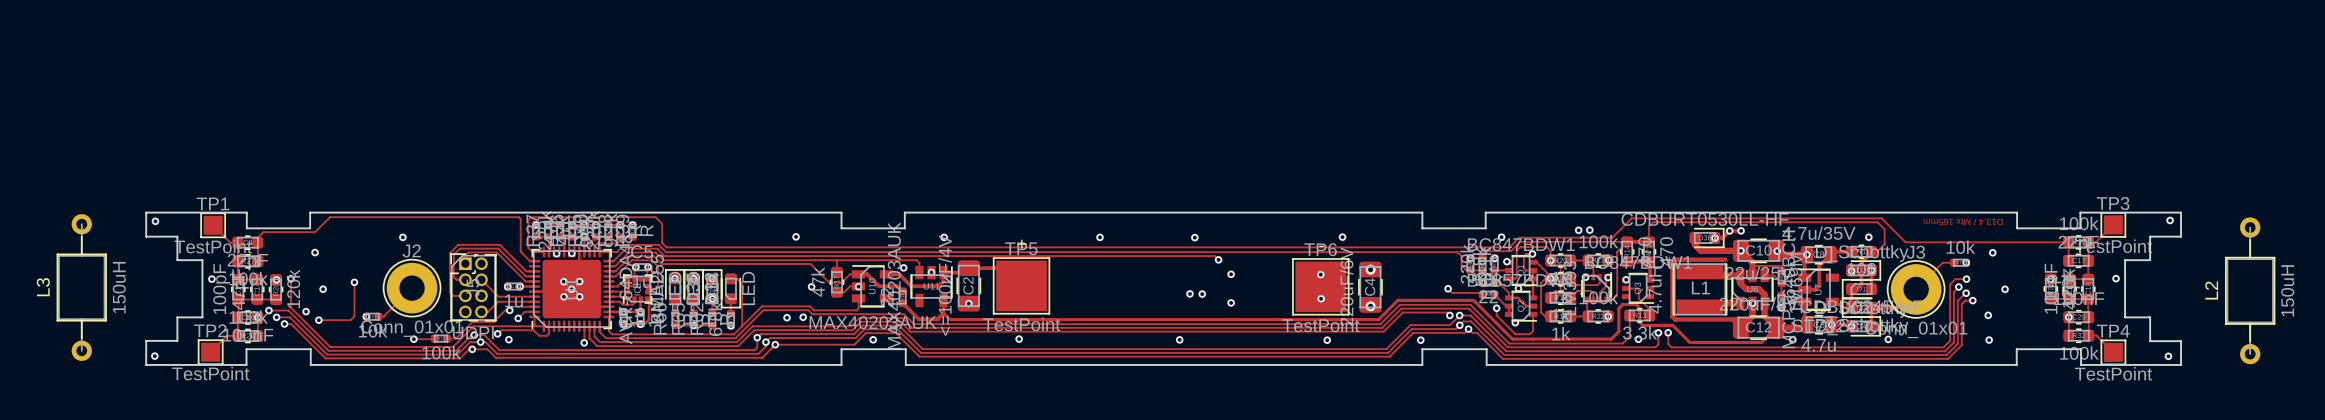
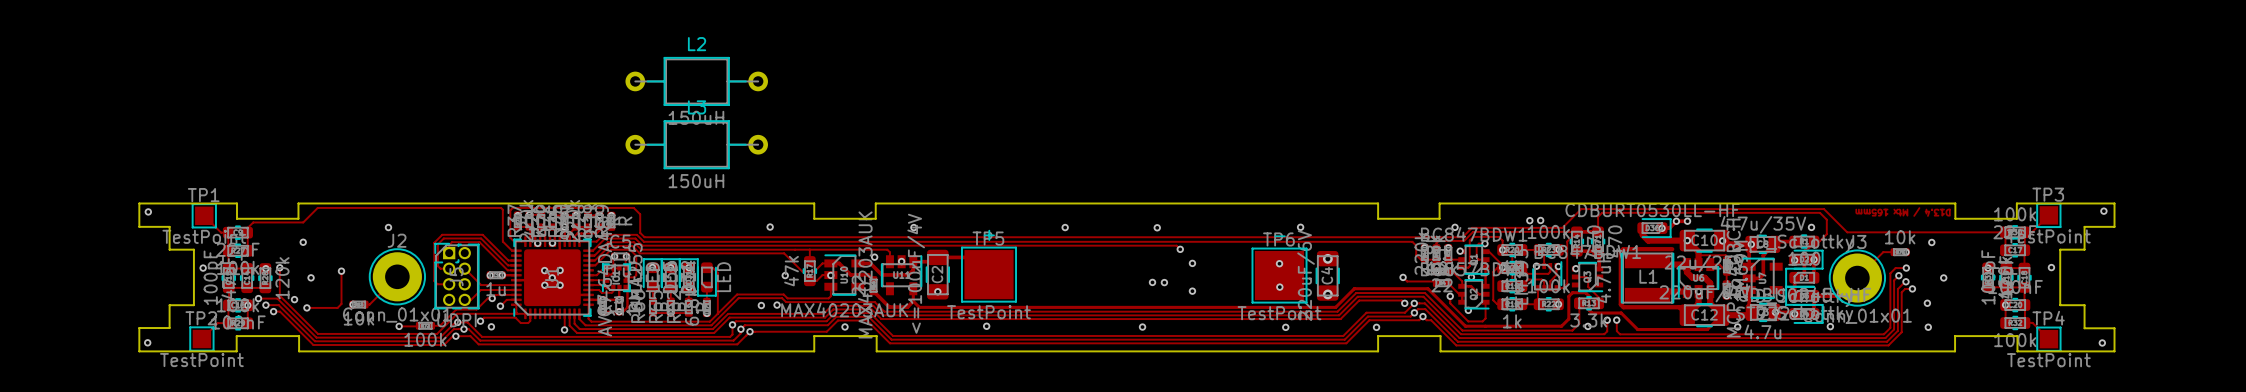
L3 rotation: 0° (81, 287) -> 90° clockwise (696, 144)
L3 position: (81, 287) -> (696, 144)
L2 rotation: 0° (2250, 290) -> 90° clockwise (696, 81)
L2 position: (2250, 290) -> (696, 81)

